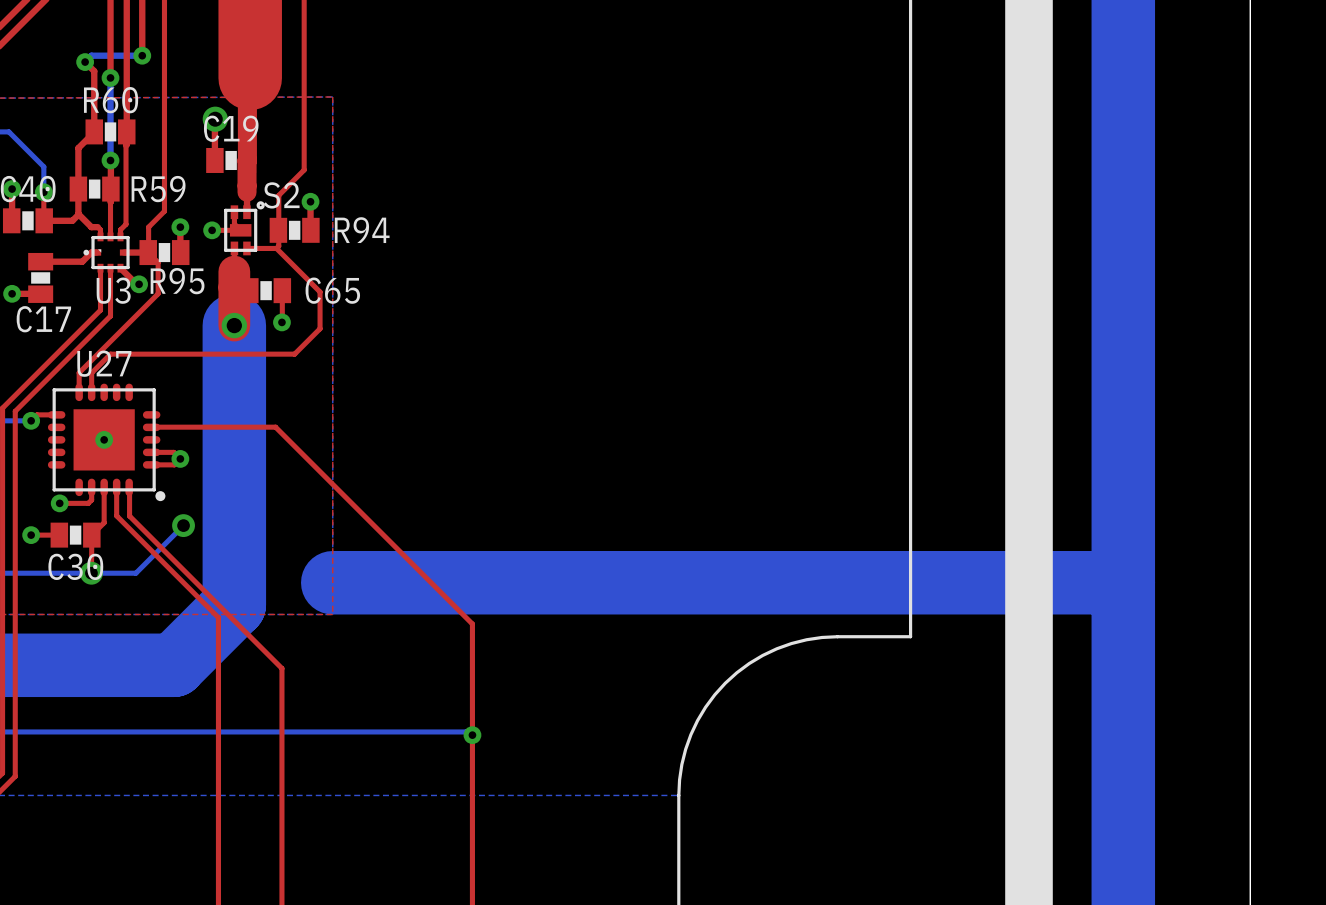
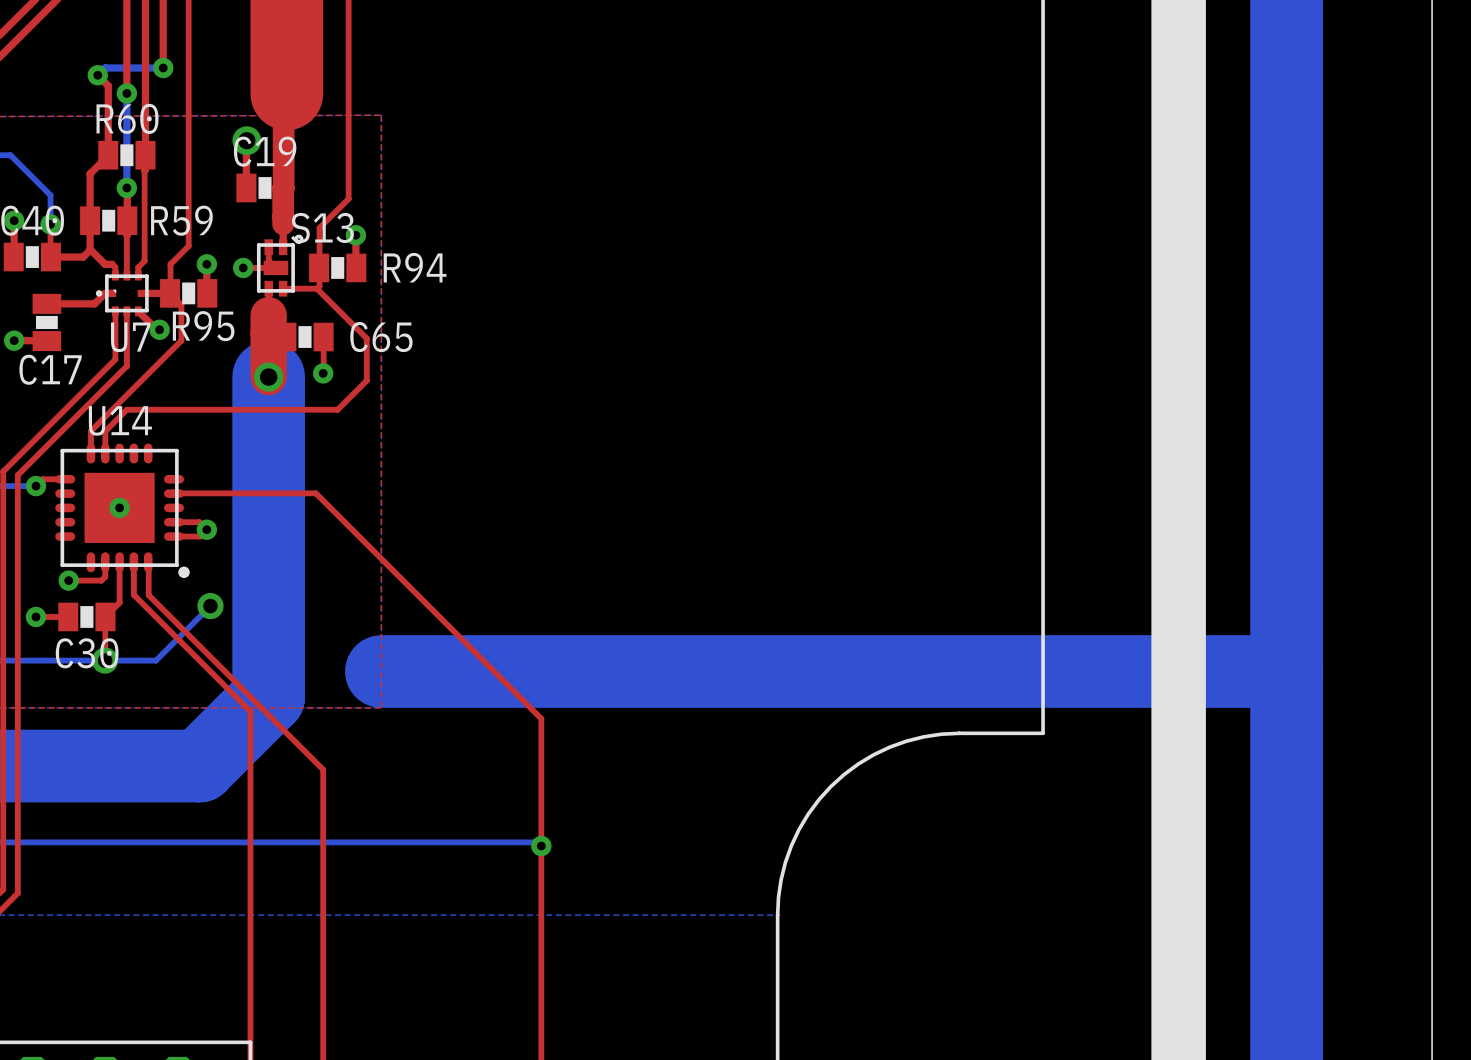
S2 name: S2 (281, 195) -> S13 (322, 227)
U3 name: U3 (113, 290) -> U7 (130, 337)
U27 name: U27 (104, 363) -> U14 (120, 420)

